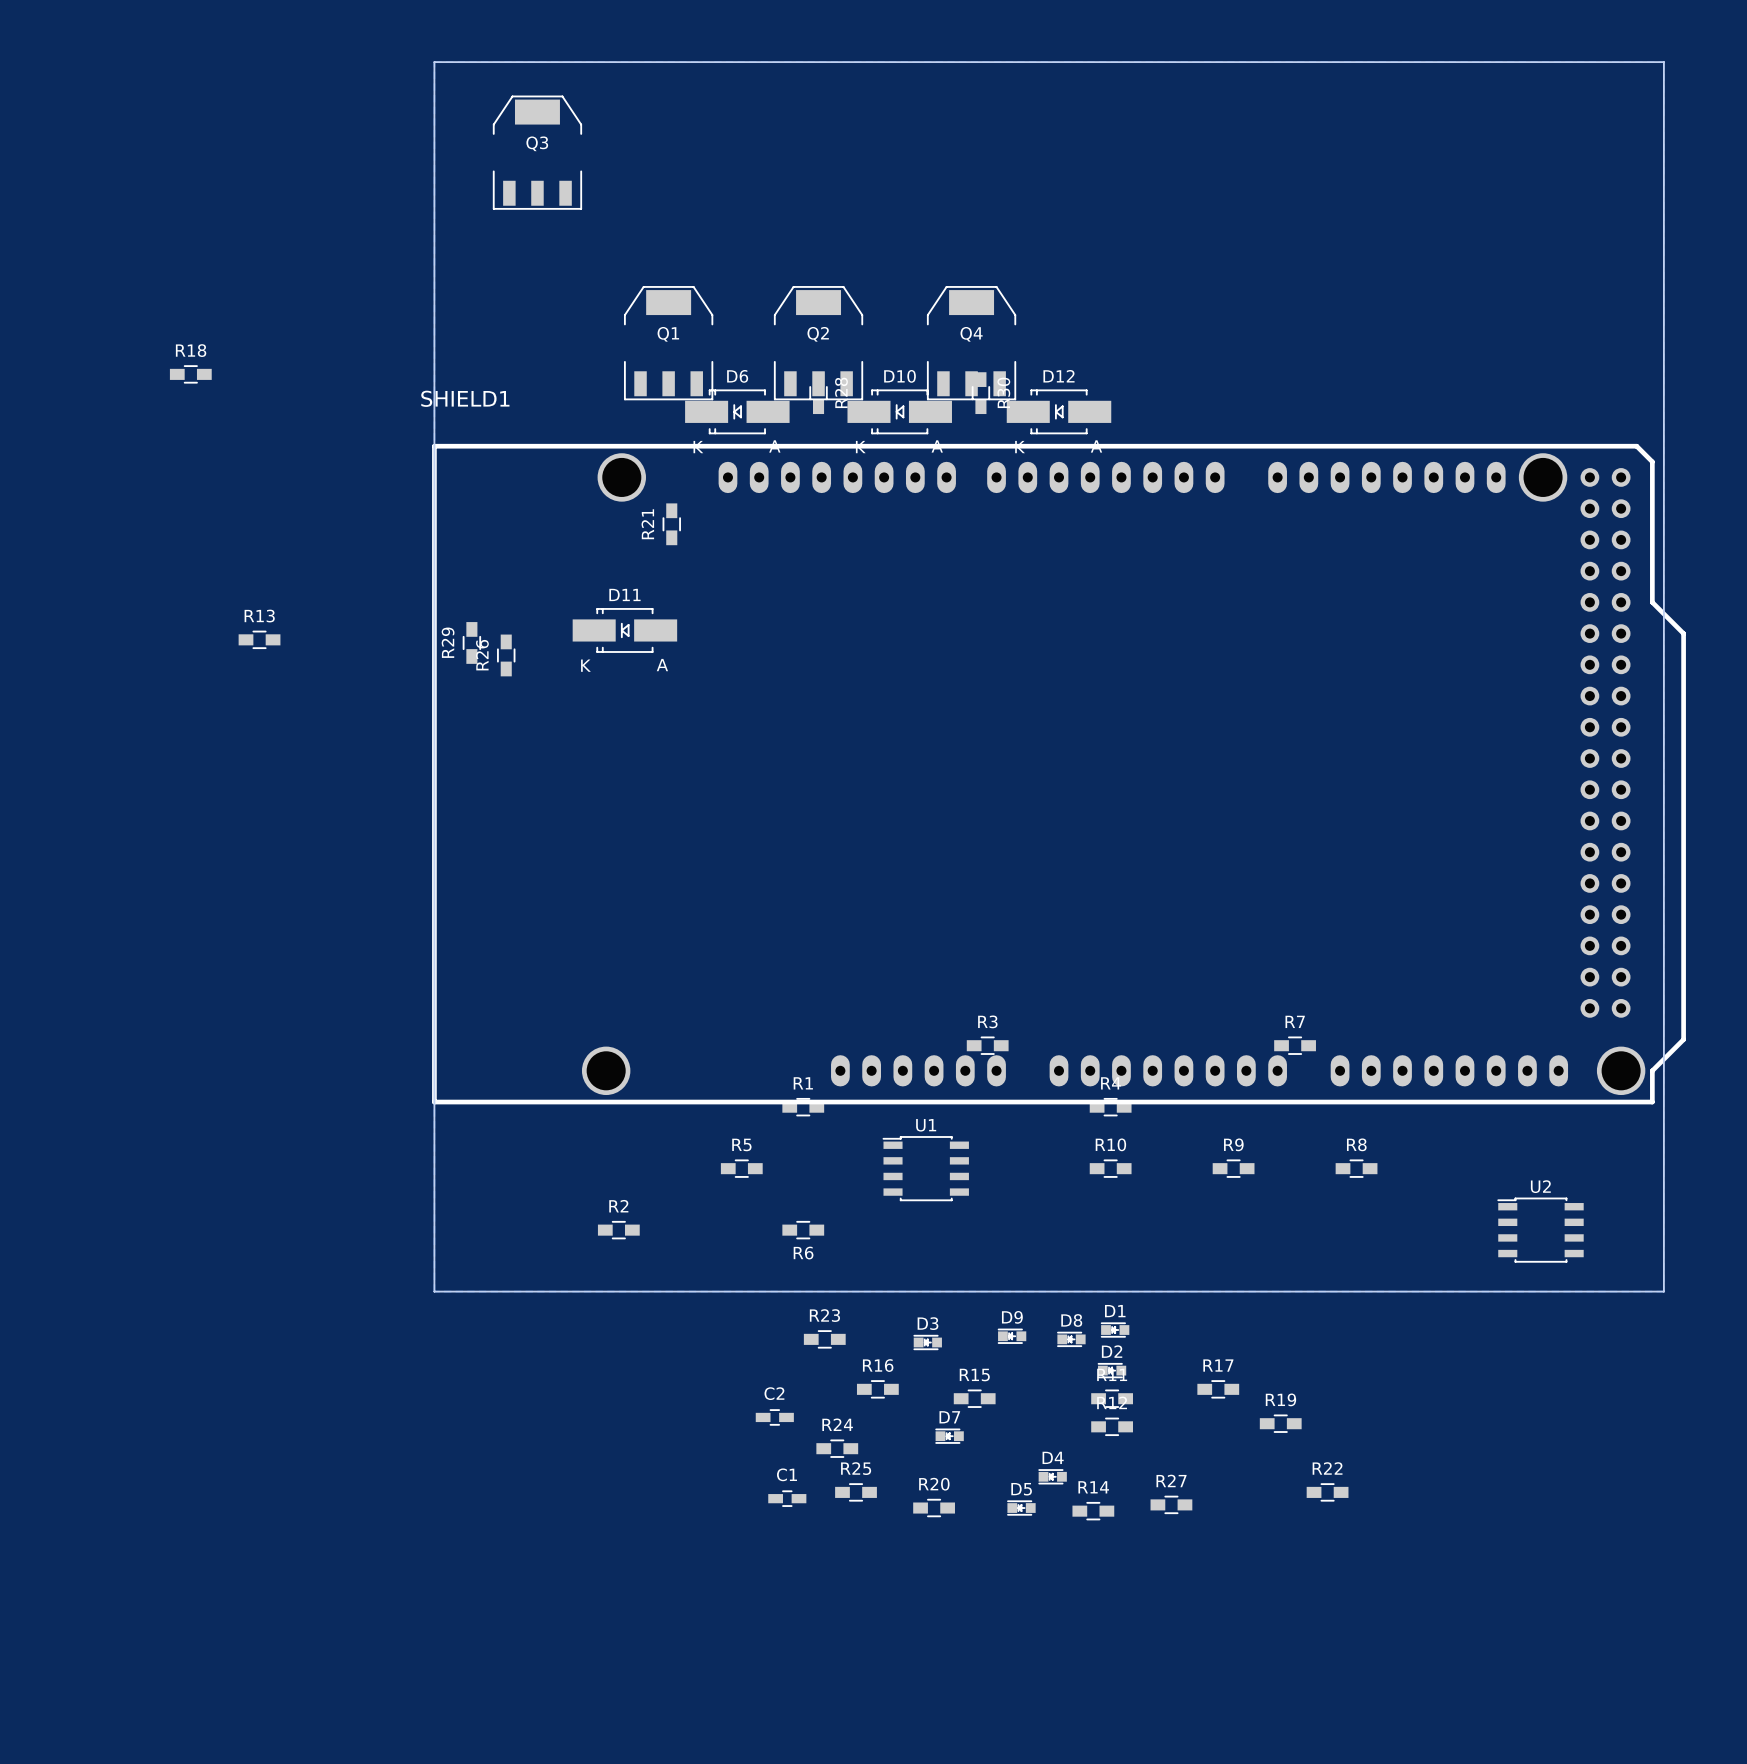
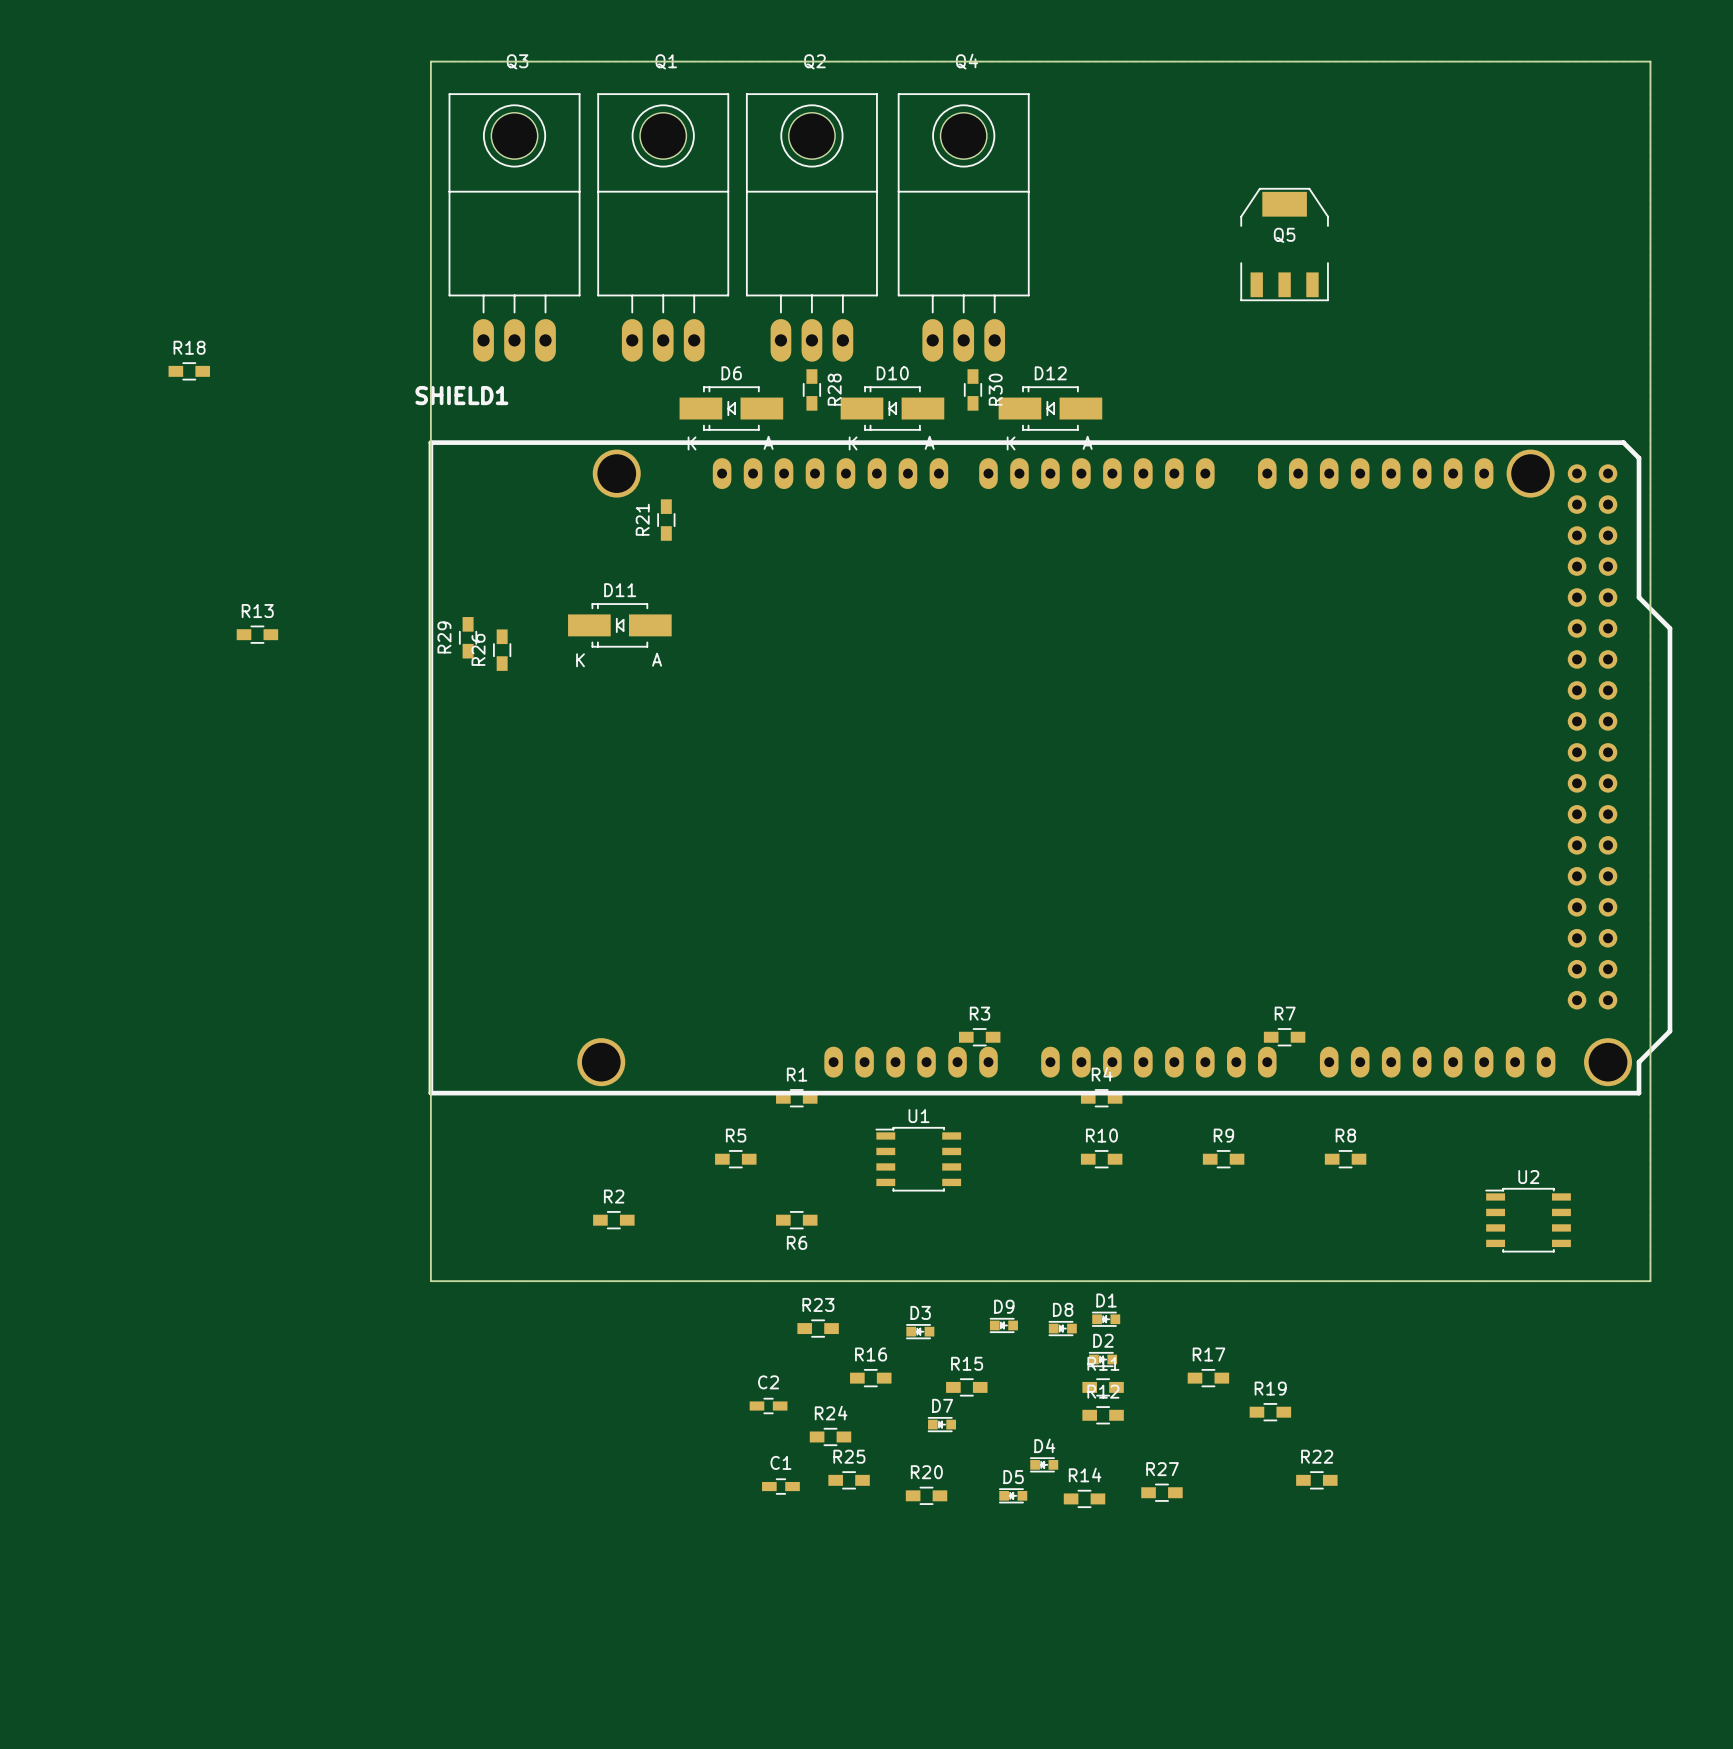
Q3 footprint: [492, 95, 583, 210] -> [448, 93, 581, 362]
Q3 name position: Q3 (537, 143) -> Q3 (517, 61)
Q5: none -> (1284, 244)
Q1 footprint: [623, 286, 714, 401] -> [597, 93, 730, 362]
Q2 footprint: [773, 286, 864, 401] -> [745, 93, 878, 362]
Q4 footprint: [926, 286, 1017, 401] -> [897, 93, 1030, 362]
Q1 name position: Q1 (668, 334) -> Q1 (666, 61)
Q2 name position: Q2 (818, 334) -> Q2 (814, 61)
Q4 name position: Q4 (971, 334) -> Q4 (967, 61)

